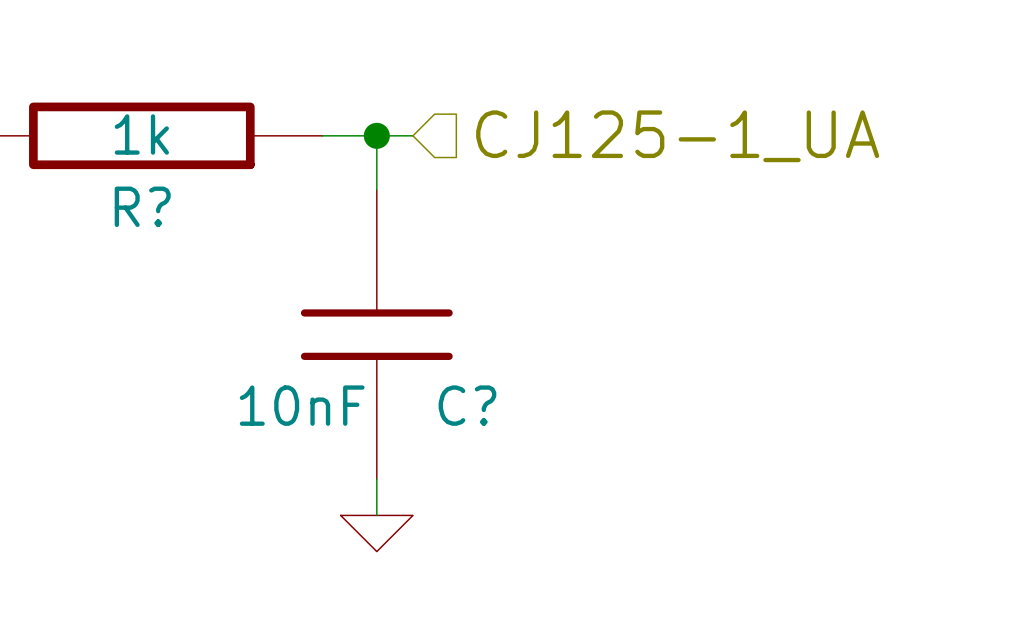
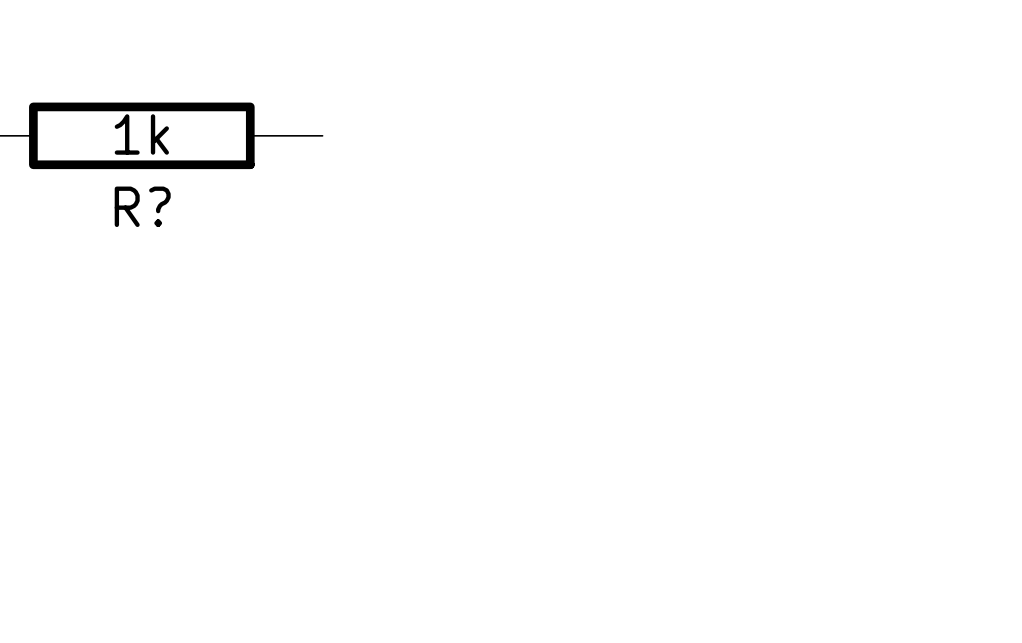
wire: (322, 135) (412, 135) -> none
wire: (376, 135) (376, 190) -> none
junction: (376, 135) -> none
hierarchical label: CJ125-1_UA (677, 136) -> none
C?: 10nF (376, 334) -> none
wire: (376, 479) (376, 515) -> none
power symbol: (376, 533) -> none

